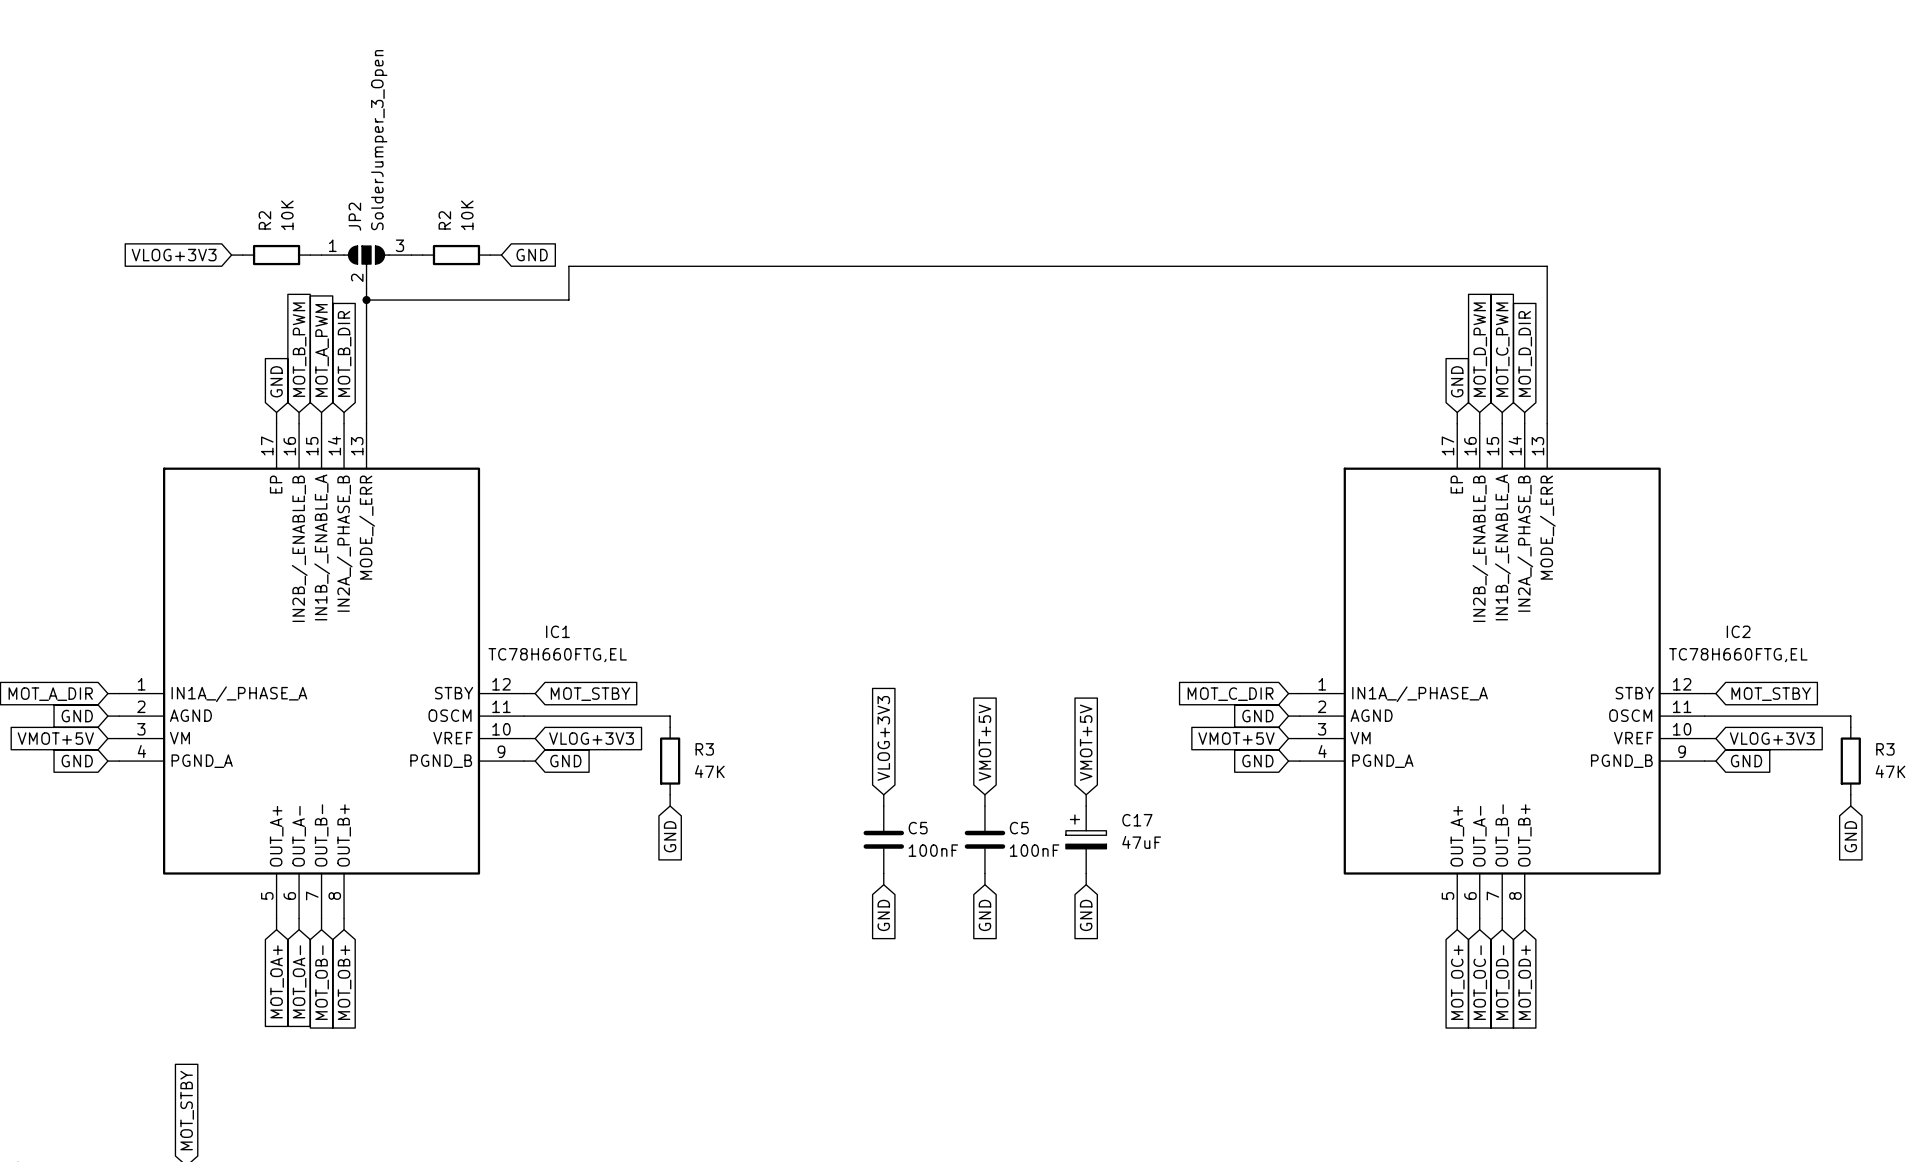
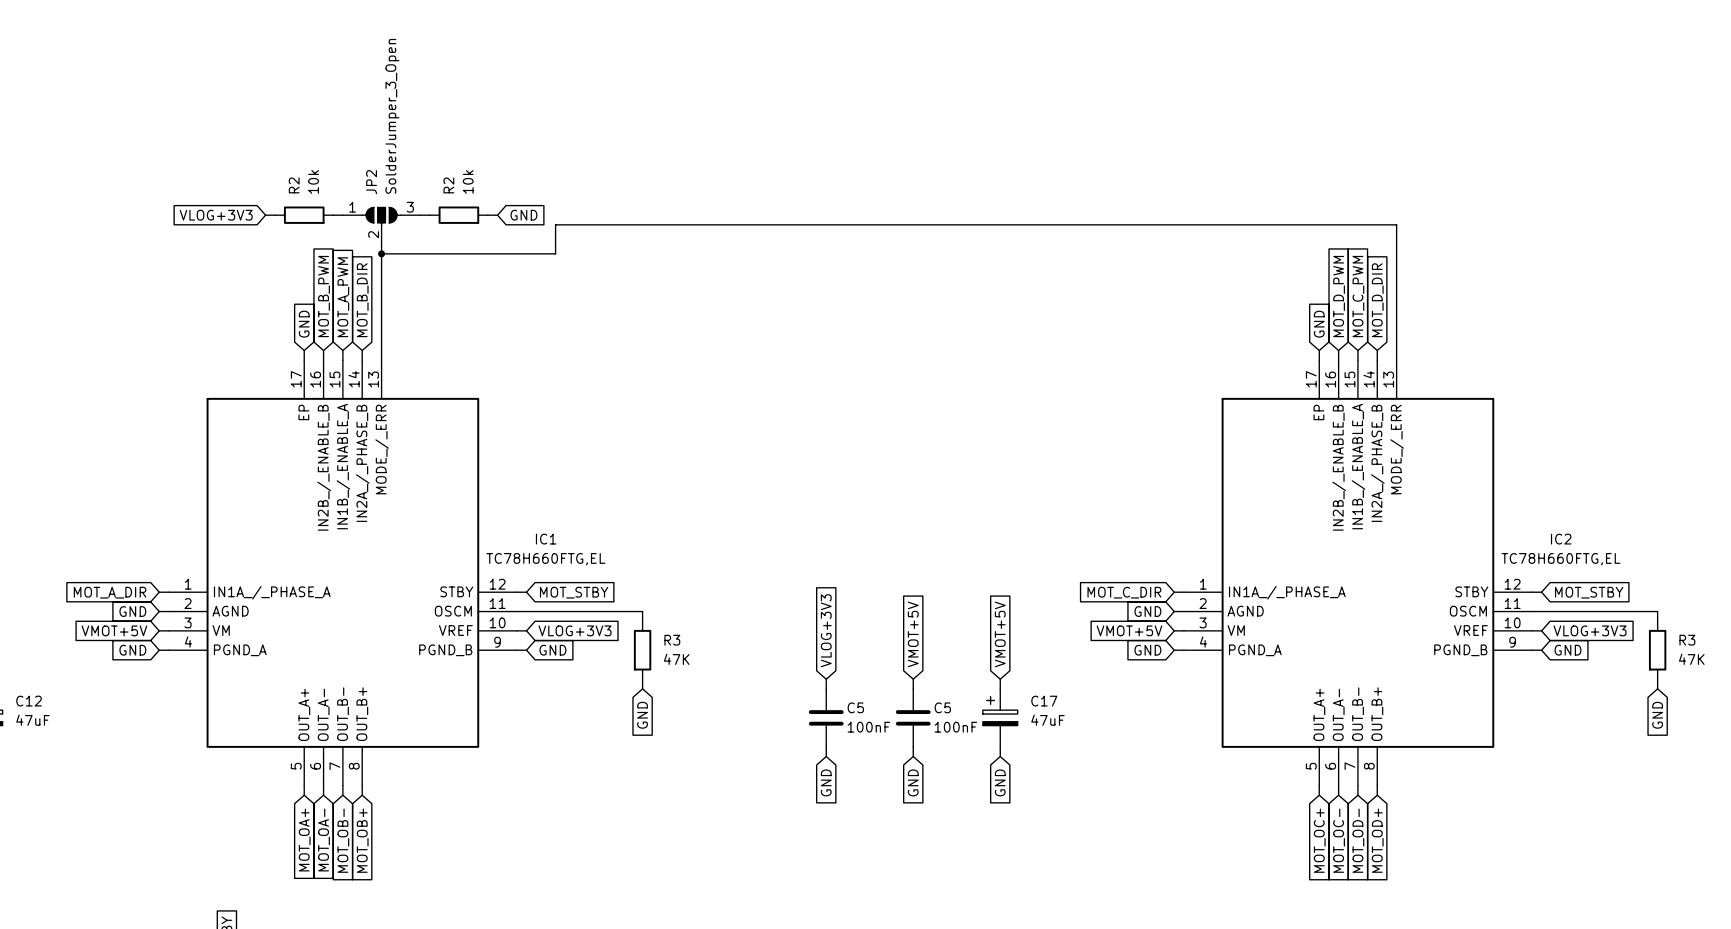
R2 value: 10K (287, 215) -> 10k (313, 181)
R2 value: 10K (467, 215) -> 10k (468, 181)

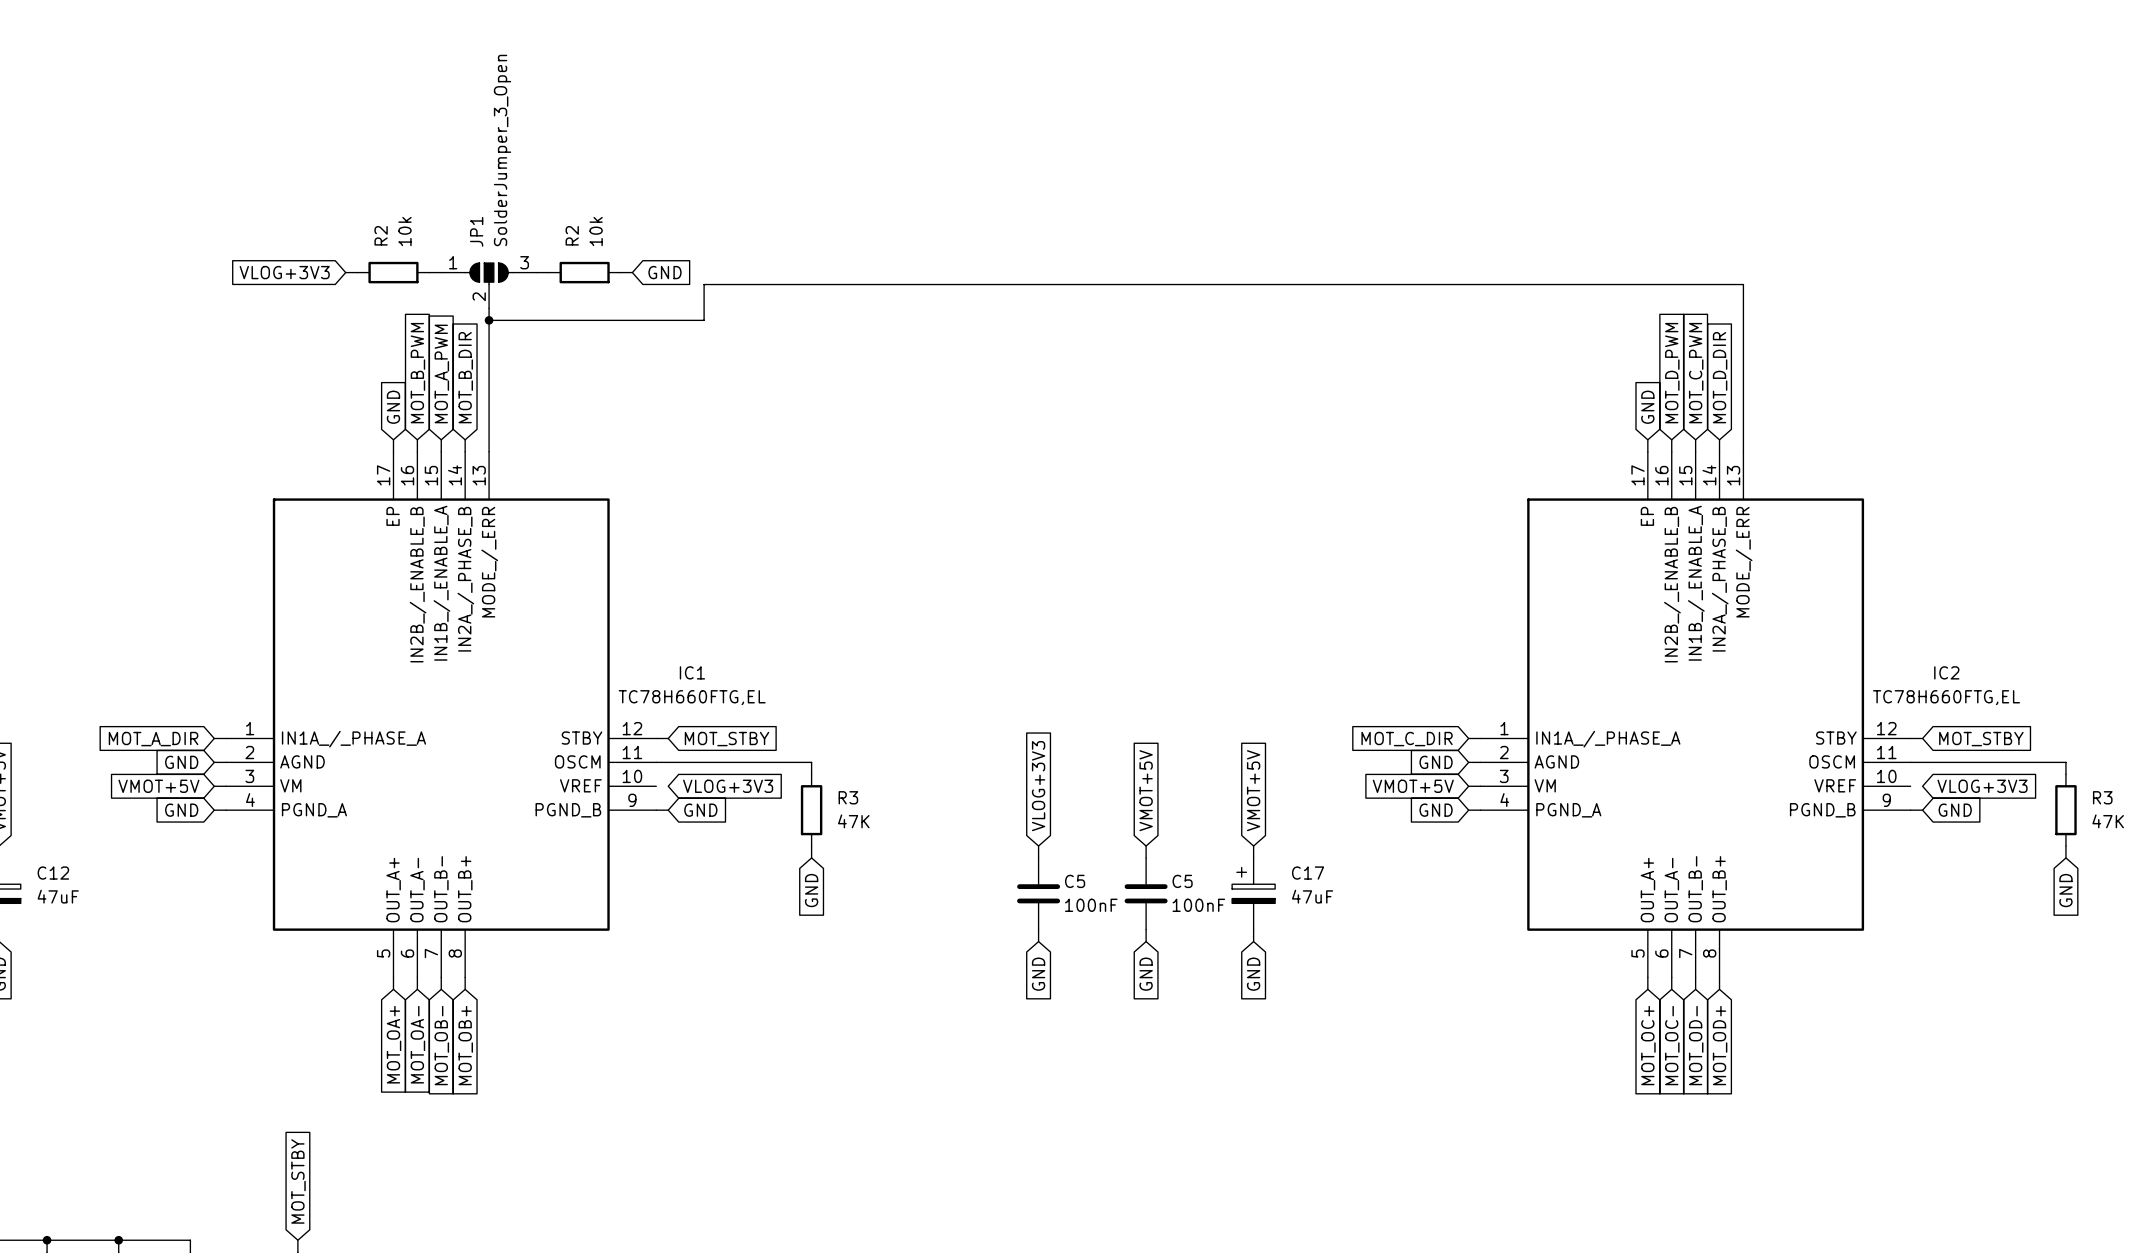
JP2 name: JP2 (371, 182) -> JP1 (476, 231)
wire: (516, 630) (526, 630) -> none
wire: (1531, 630) (1541, 630) -> none

